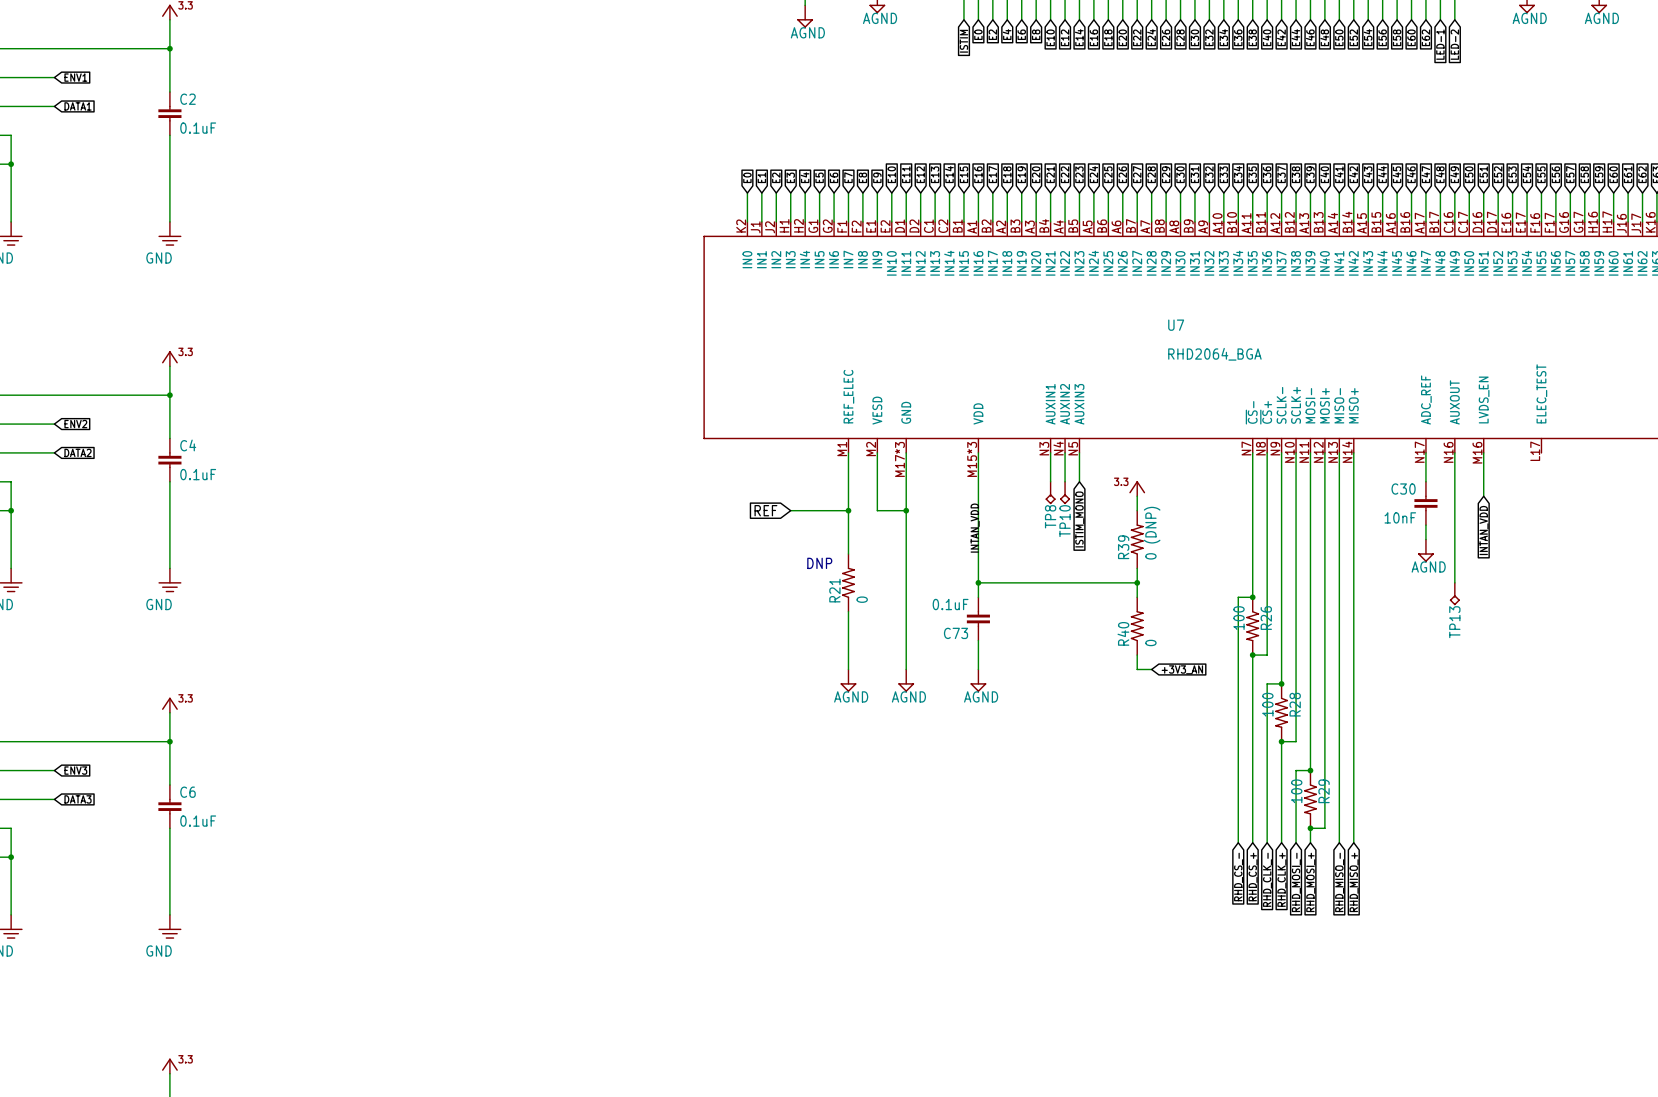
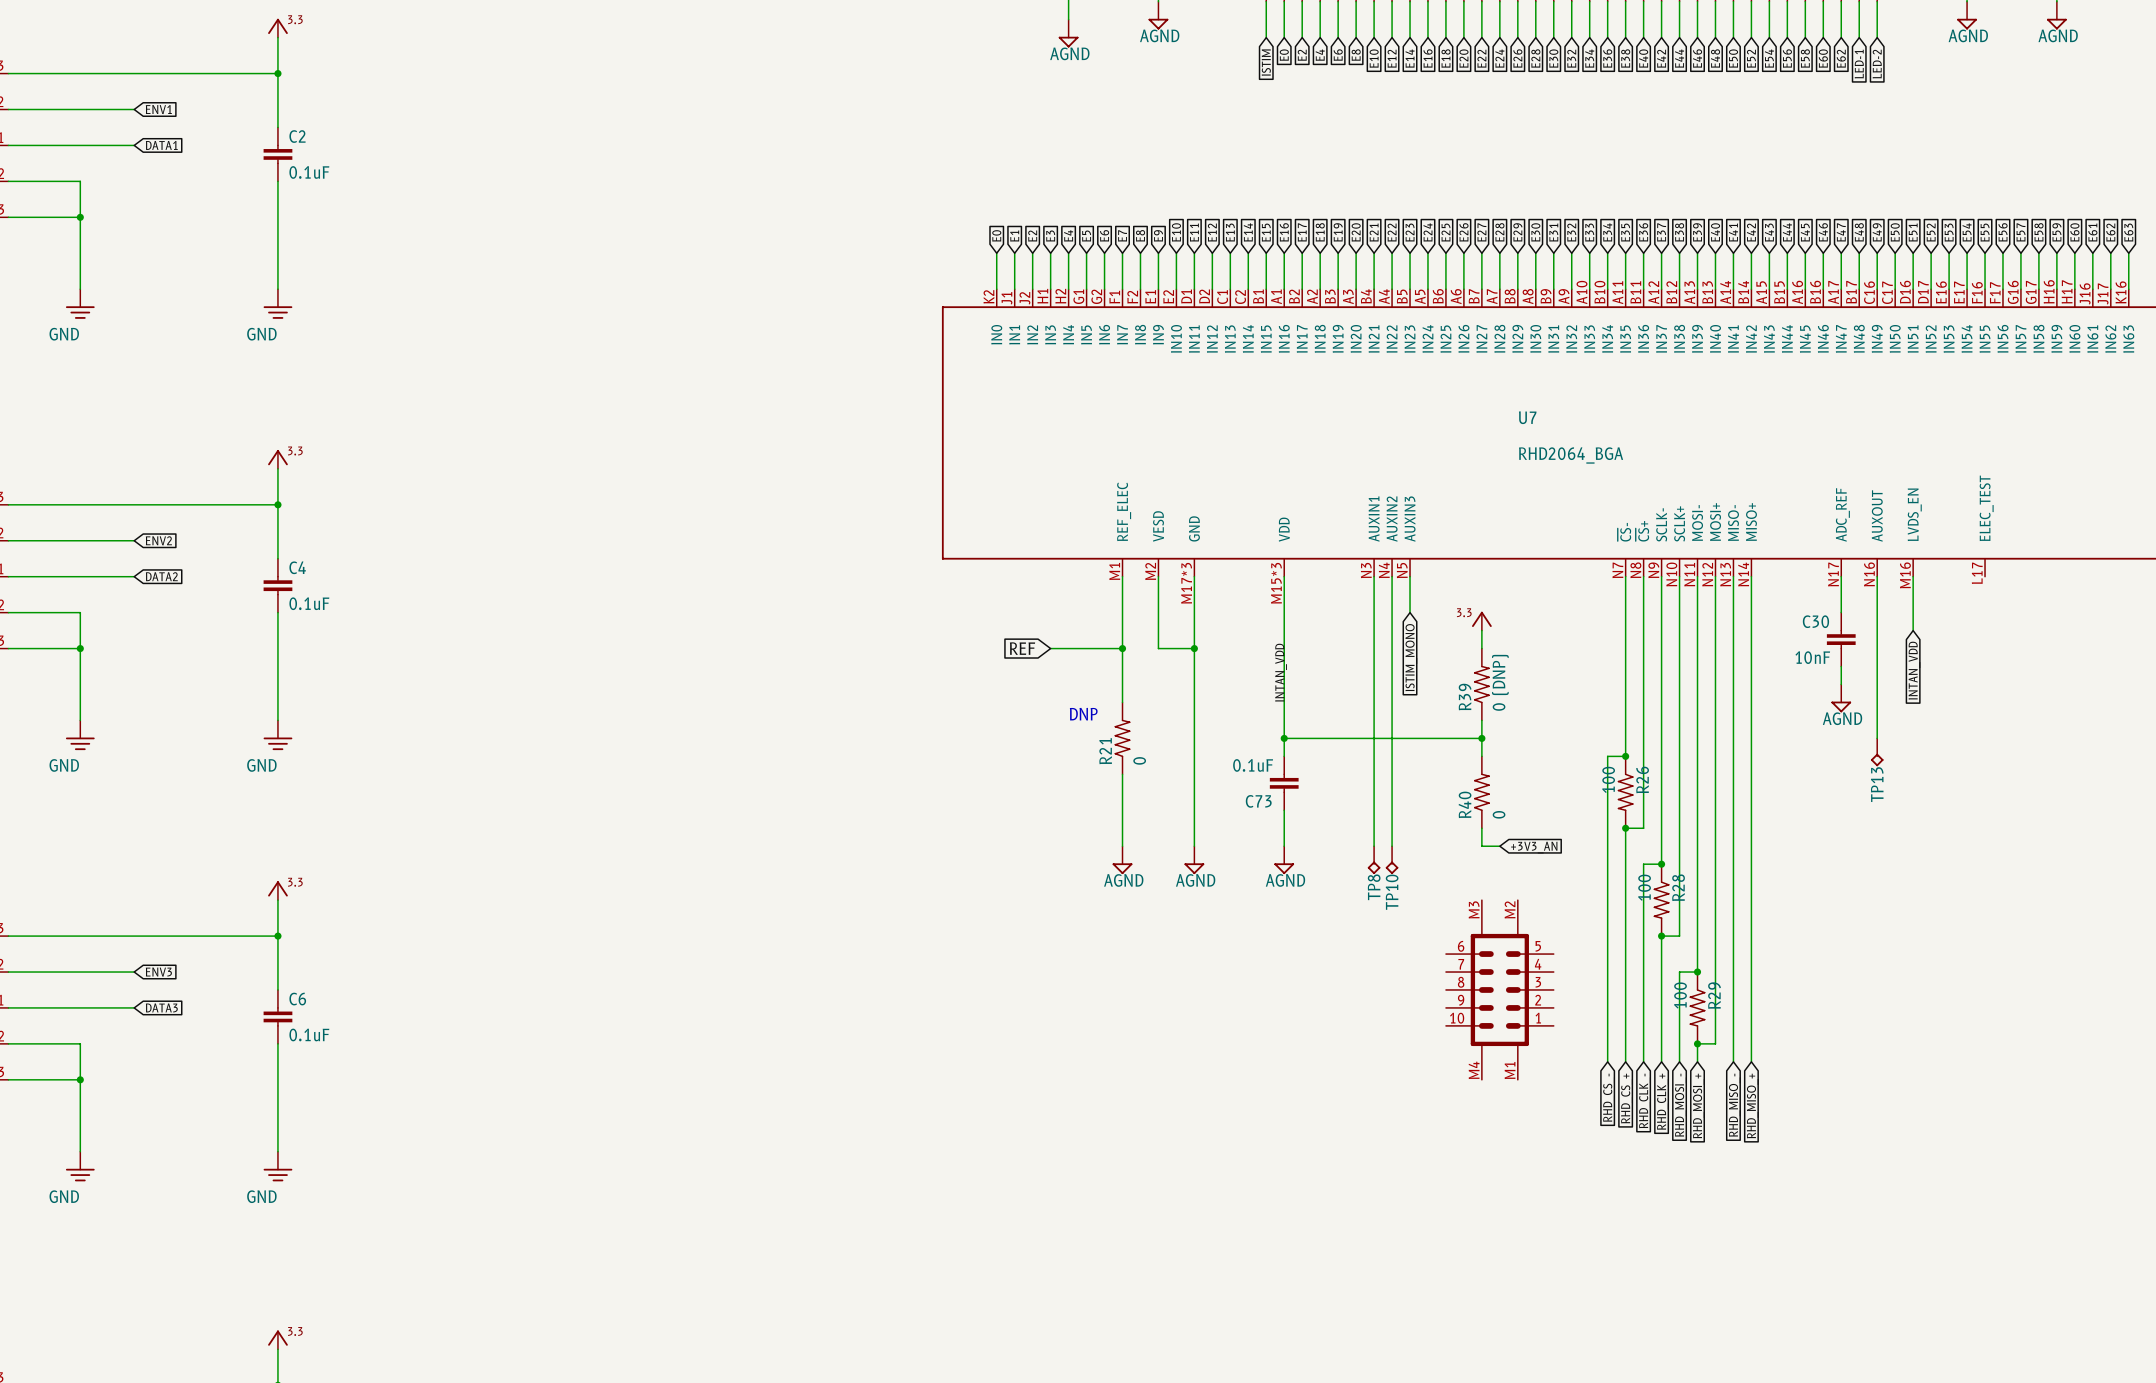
wire: none -> (1374, 612) (1374, 846)
wire: none -> (1392, 612) (1392, 846)
TP8 position: (1050, 493) -> (1374, 860)
TP10 position: (1065, 493) -> (1392, 860)
part: none -> (1499, 989)

